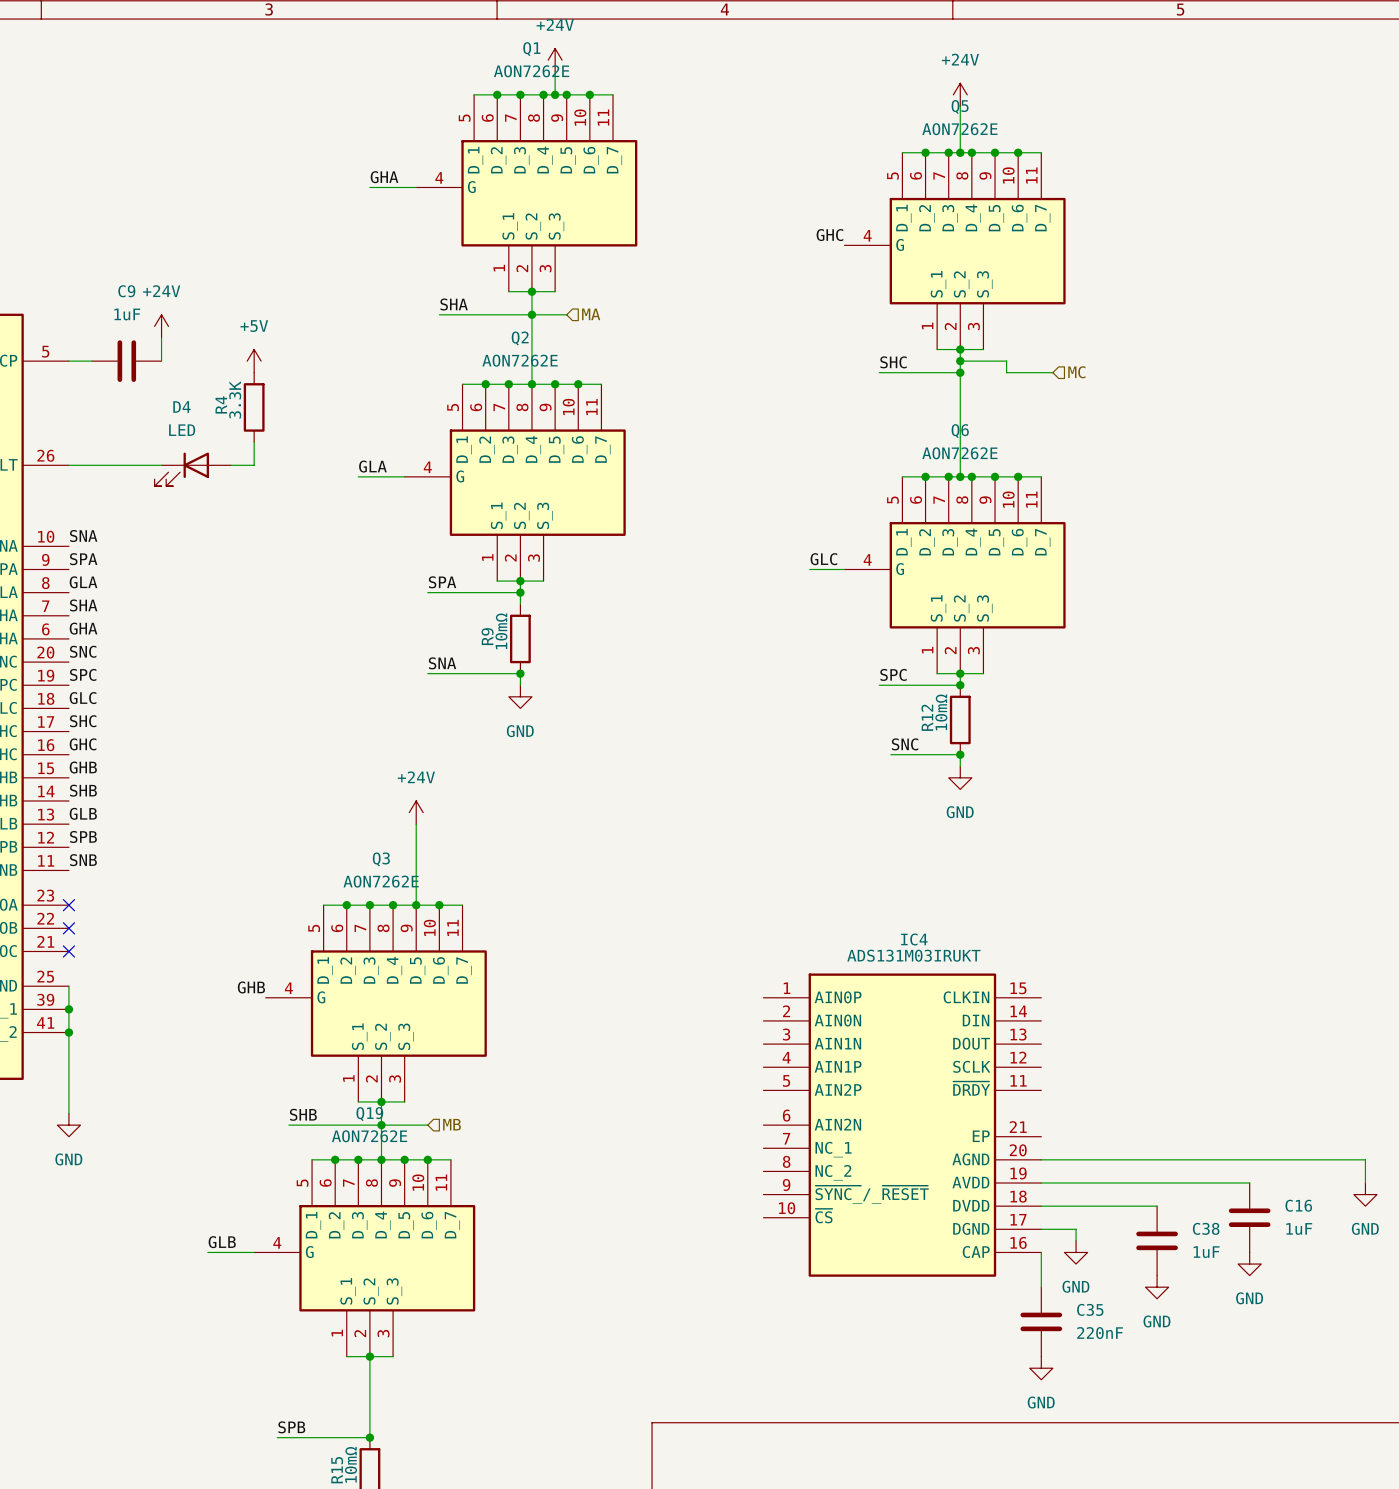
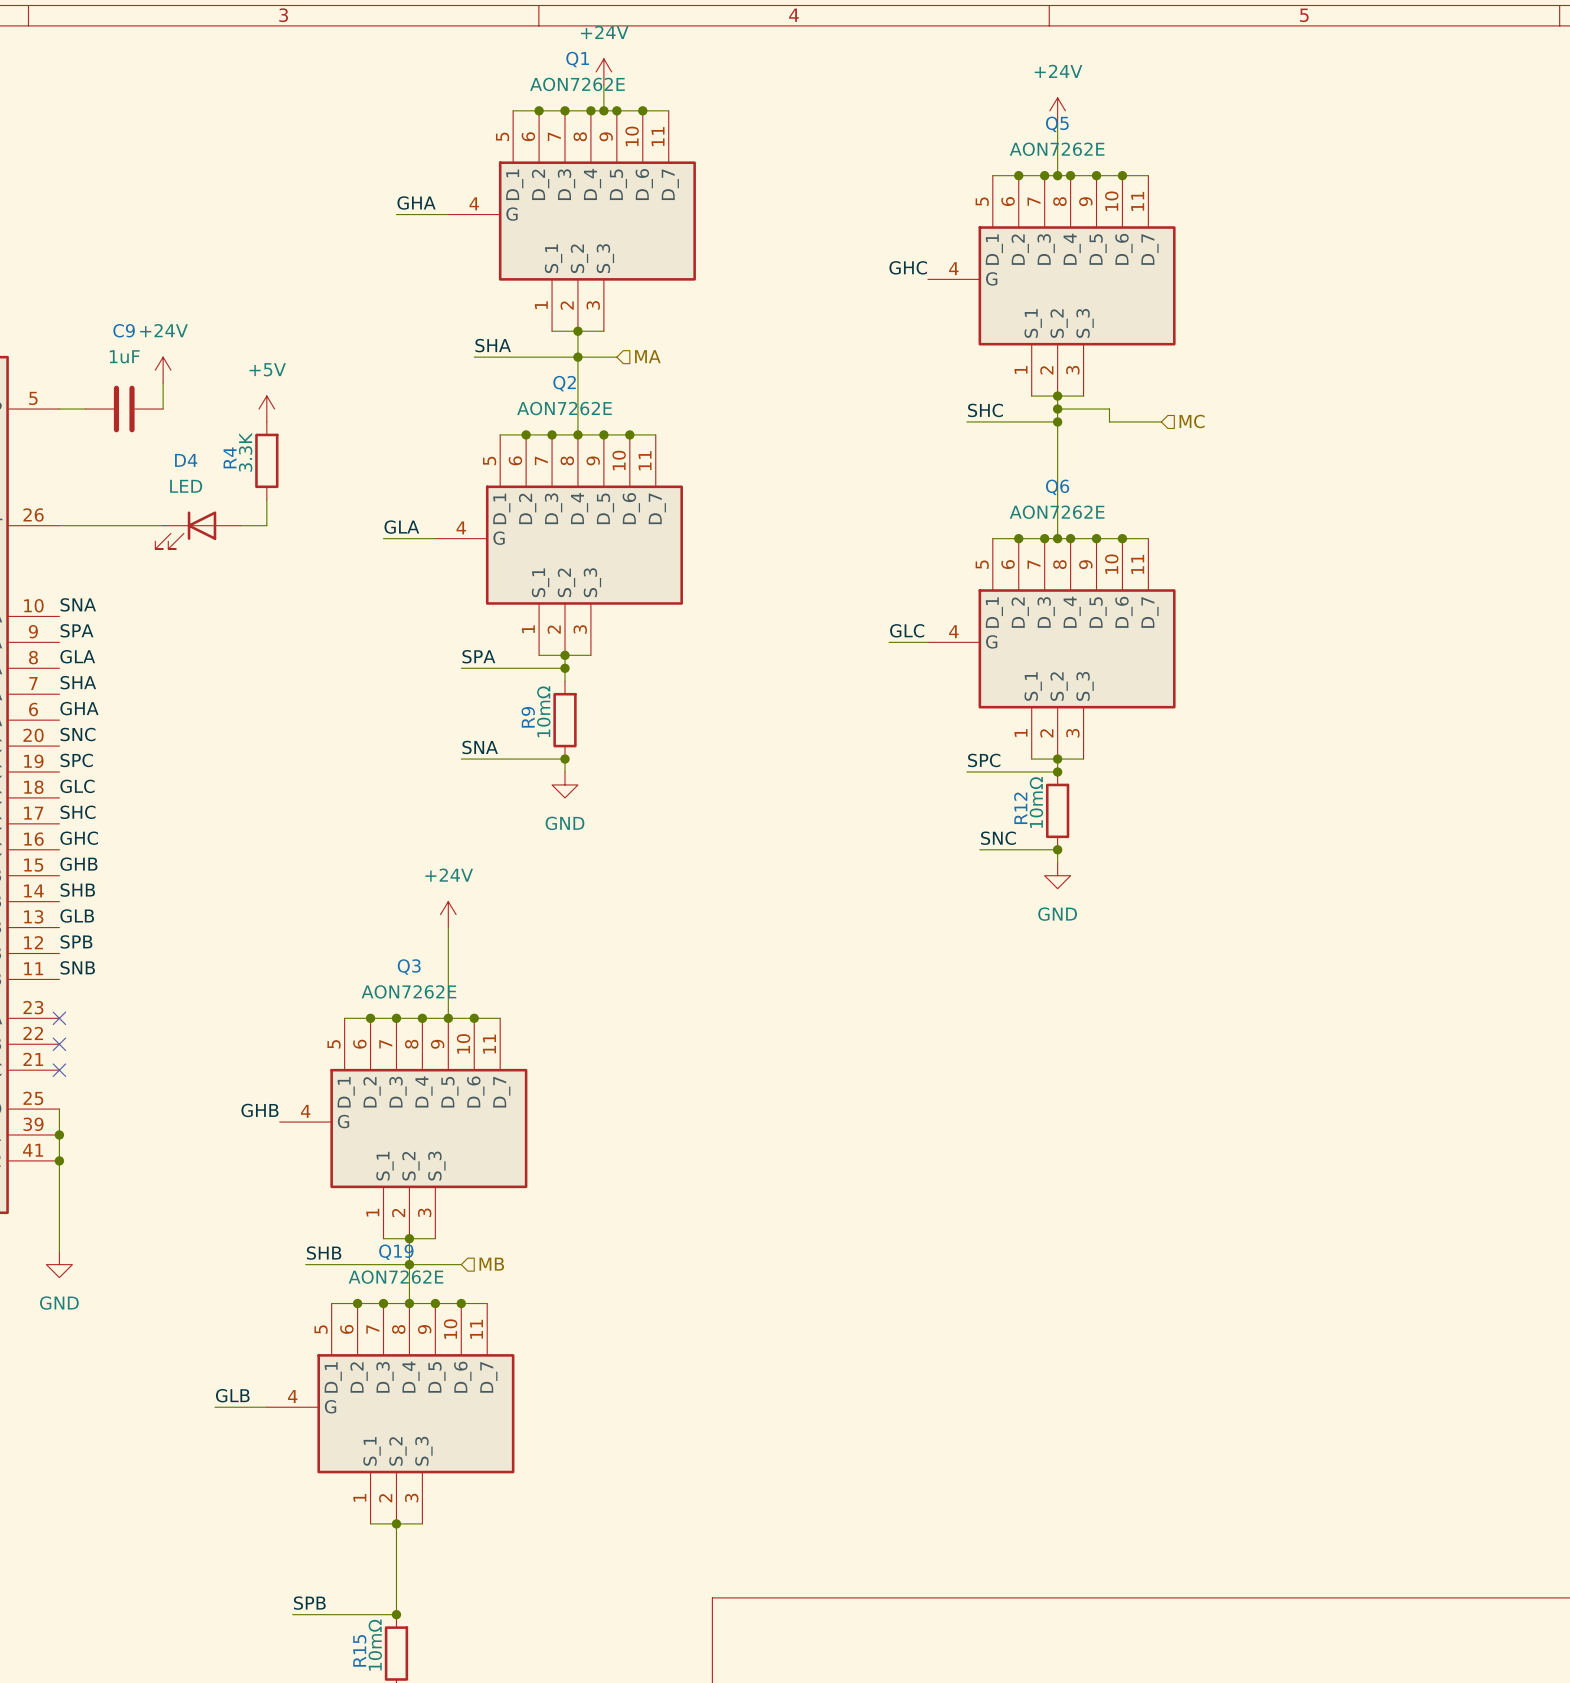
IC4: ADS131M03IRUKT (902, 1125) -> none
wire: (1041, 1159) (1365, 1159) (1365, 1183) -> none
wire: (1041, 1183) (1249, 1183) -> none
power symbol: GND (1365, 1194) -> none
wire: (1041, 1206) (1157, 1206) -> none
C16: 1uF (1249, 1217) -> none
wire: (1041, 1229) (1076, 1229) (1076, 1240) -> none
C38: 1uF (1157, 1240) -> none
wire: (1041, 1252) (1041, 1287) -> none
power symbol: GND (1076, 1252) -> none
power symbol: GND (1249, 1264) -> none
power symbol: GND (1157, 1287) -> none
C35: 220nF (1041, 1321) -> none
power symbol: GND (1041, 1368) -> none

